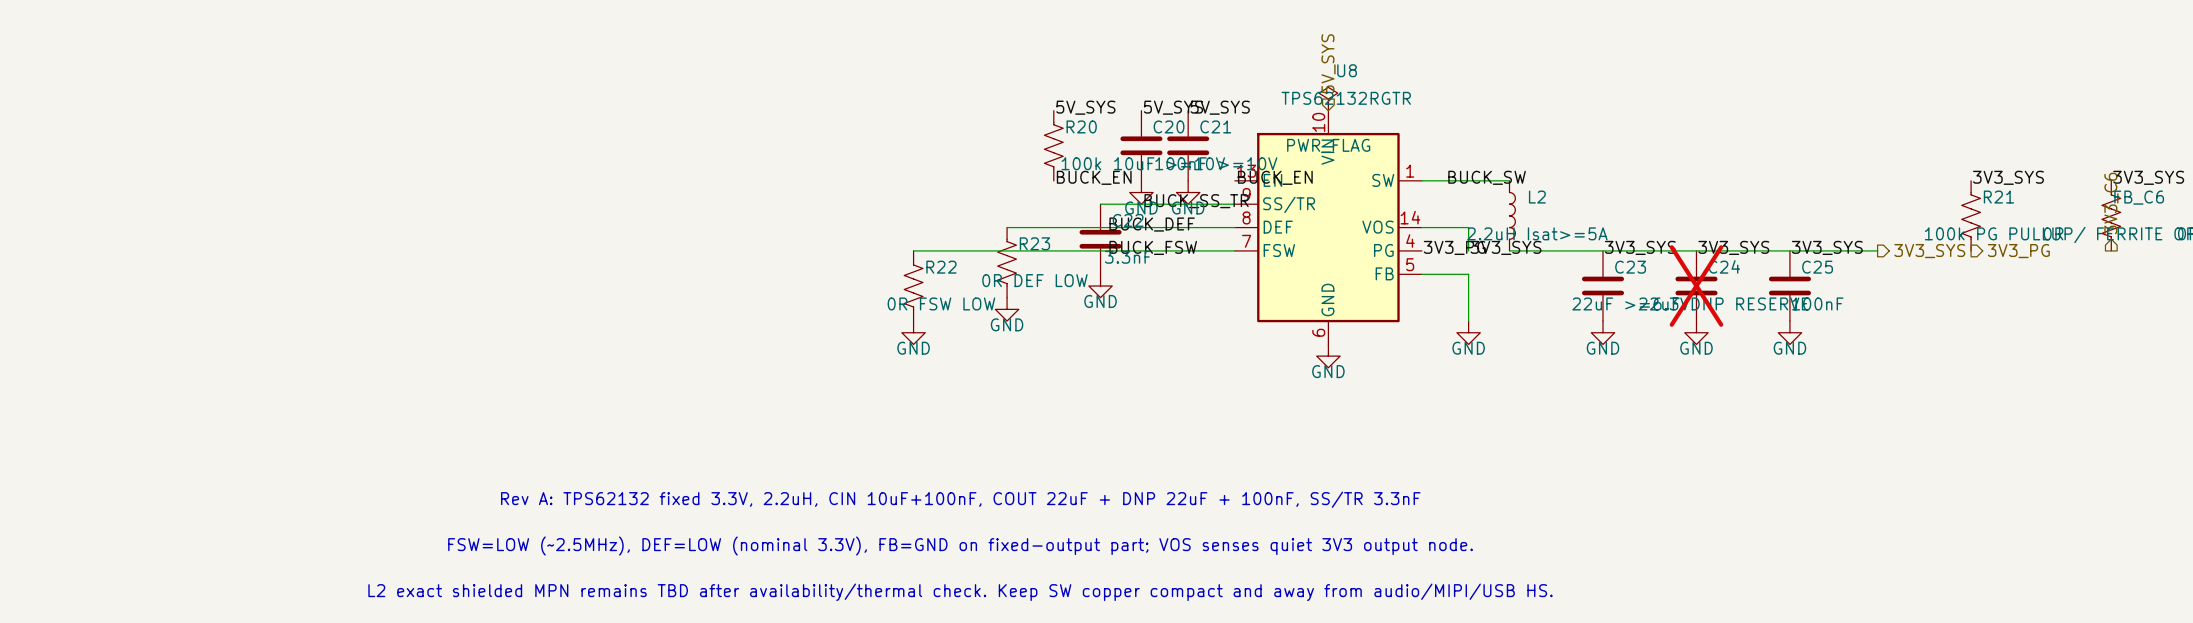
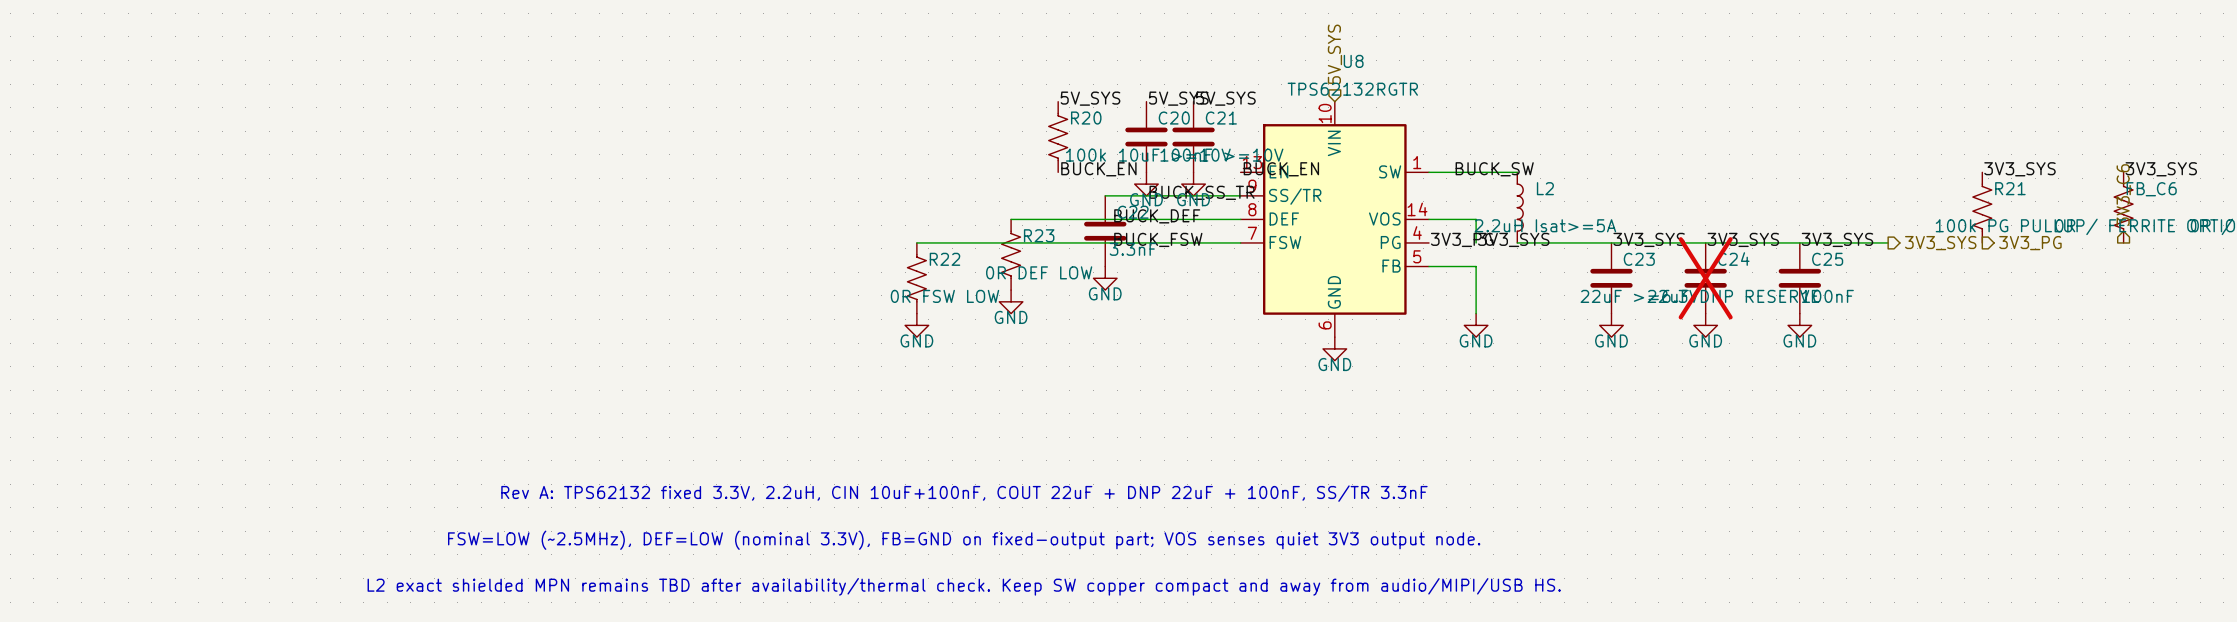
power symbol: PWR_FLAG (1328, 99) -> none

